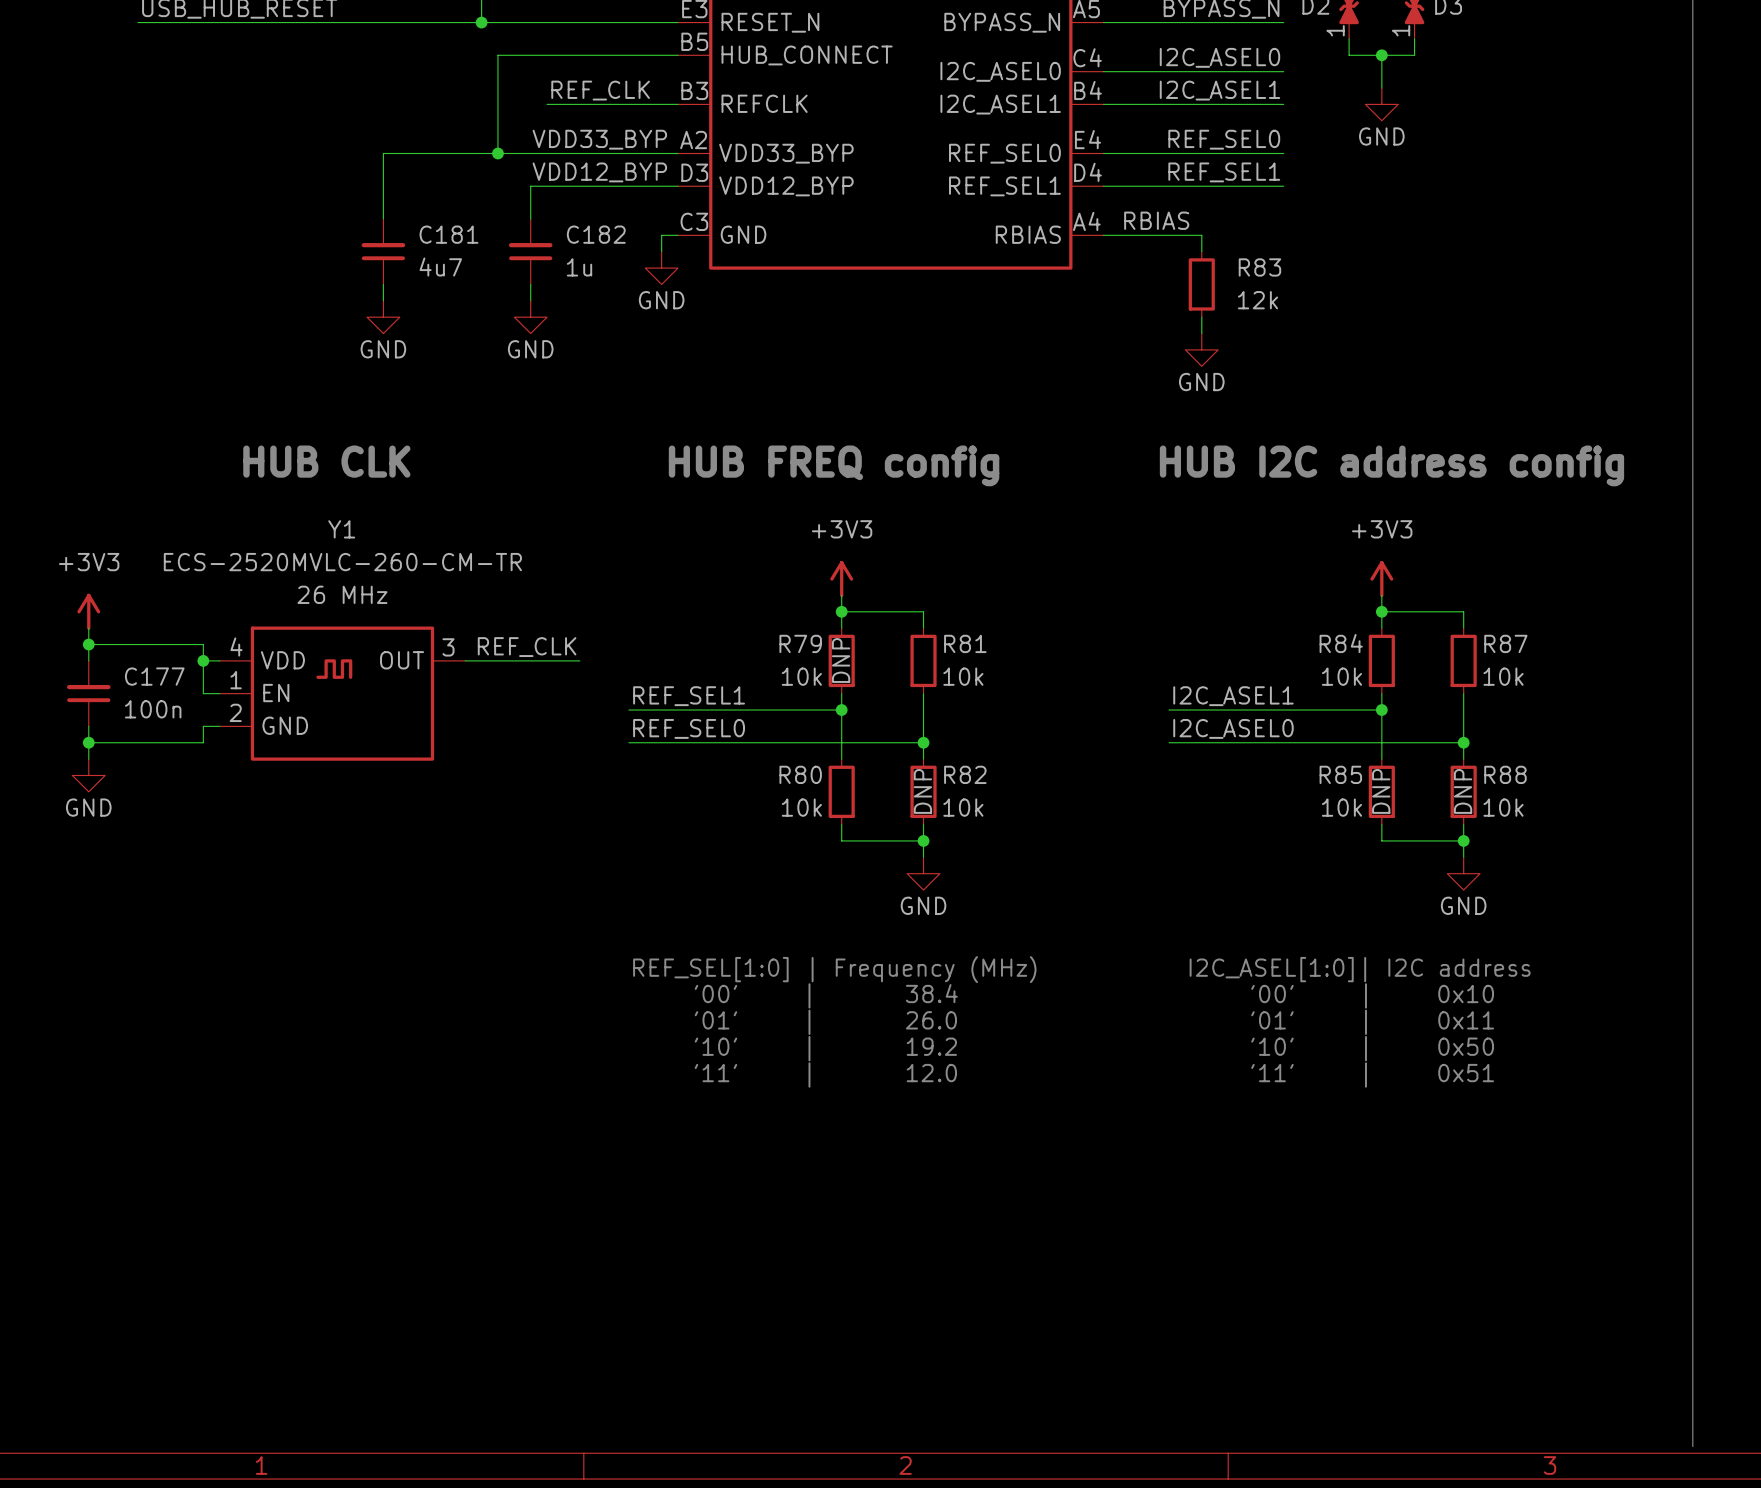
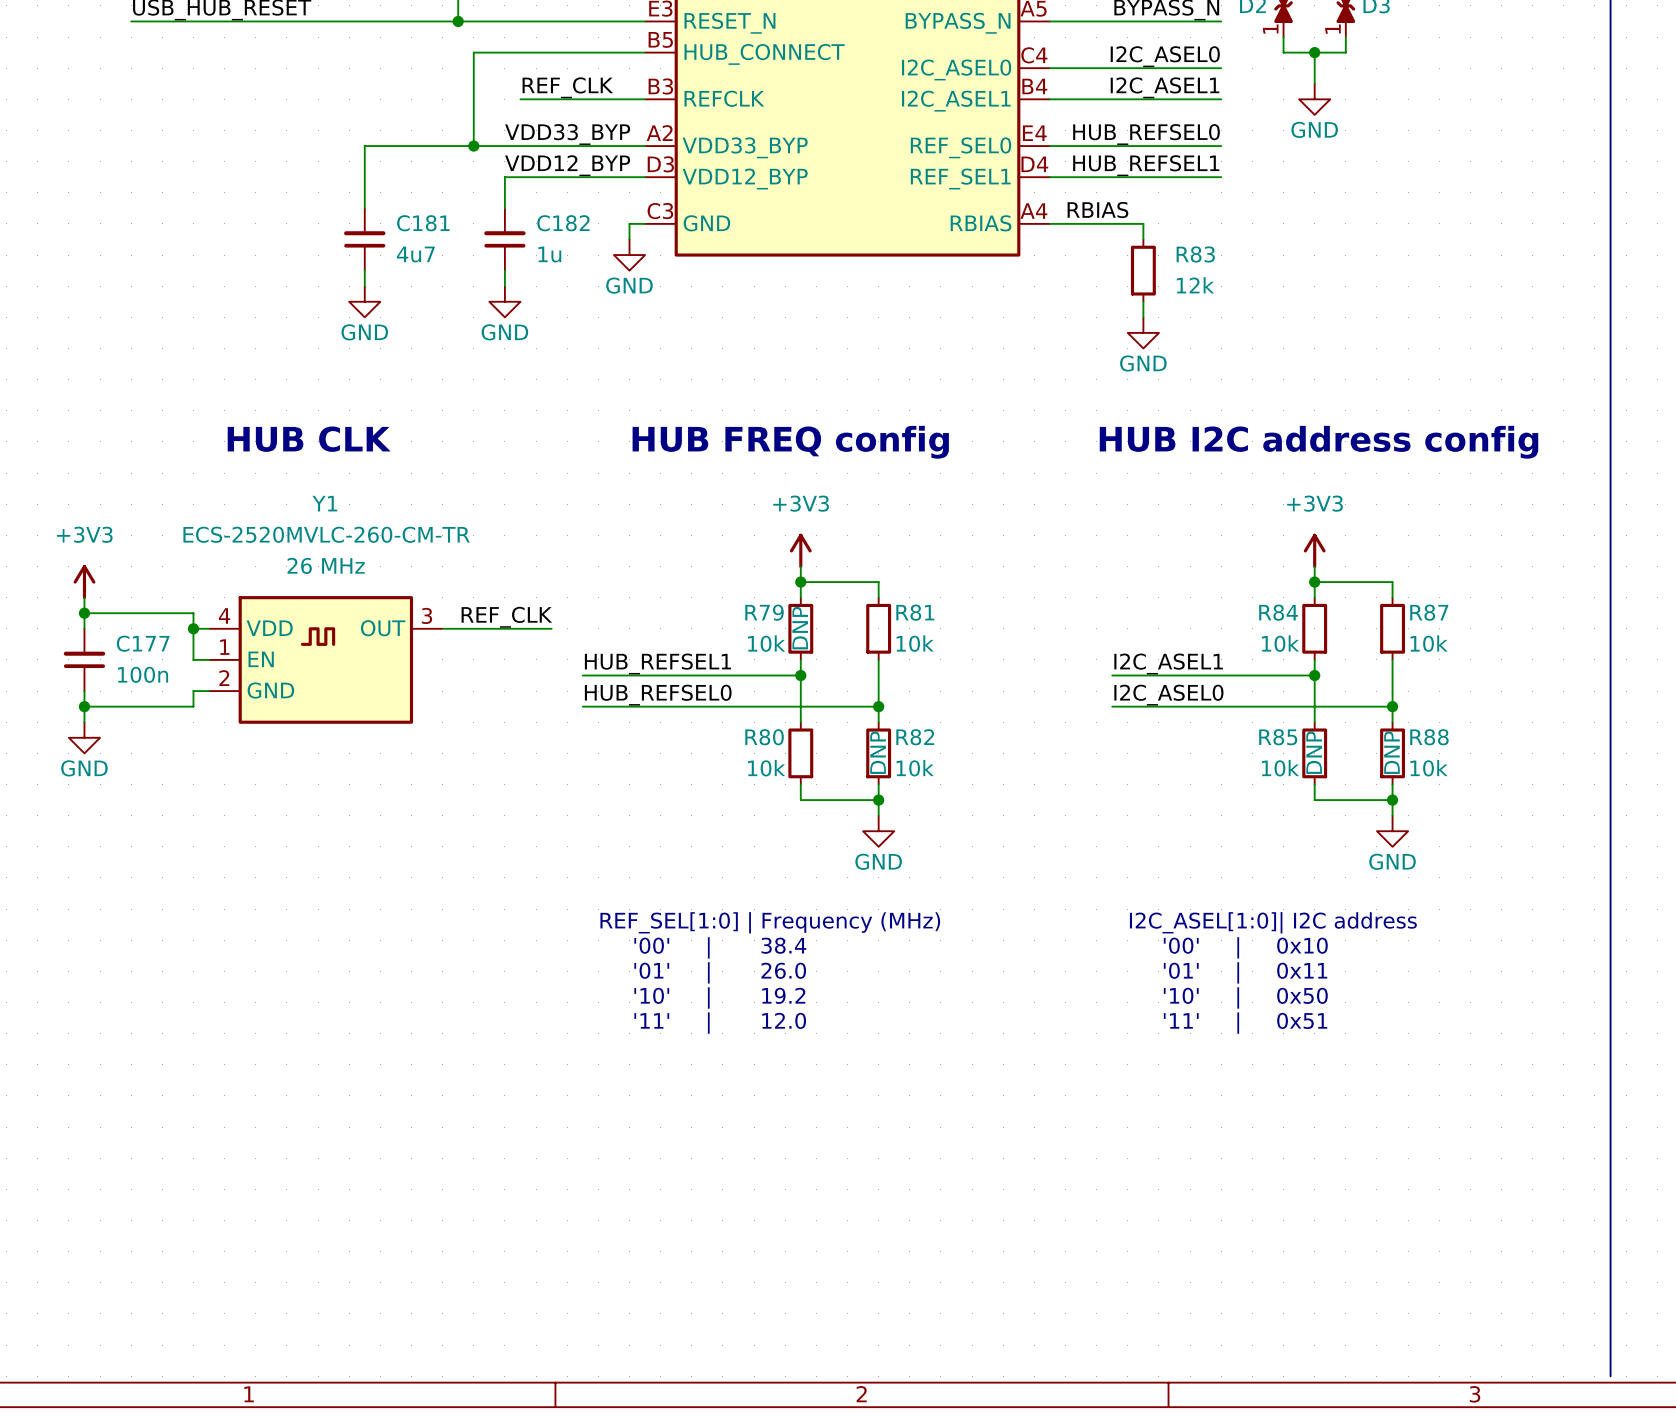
label: REF_SEL0 (1224, 139) -> HUB_REFSEL0 (1146, 134)
label: REF_SEL1 (1224, 172) -> HUB_REFSEL1 (1146, 165)
label: REF_SEL1 (689, 696) -> HUB_REFSEL1 (657, 663)
wire: none -> (582, 675) (598, 675)
label: REF_SEL0 (689, 728) -> HUB_REFSEL0 (658, 695)
wire: none -> (582, 706) (598, 706)

